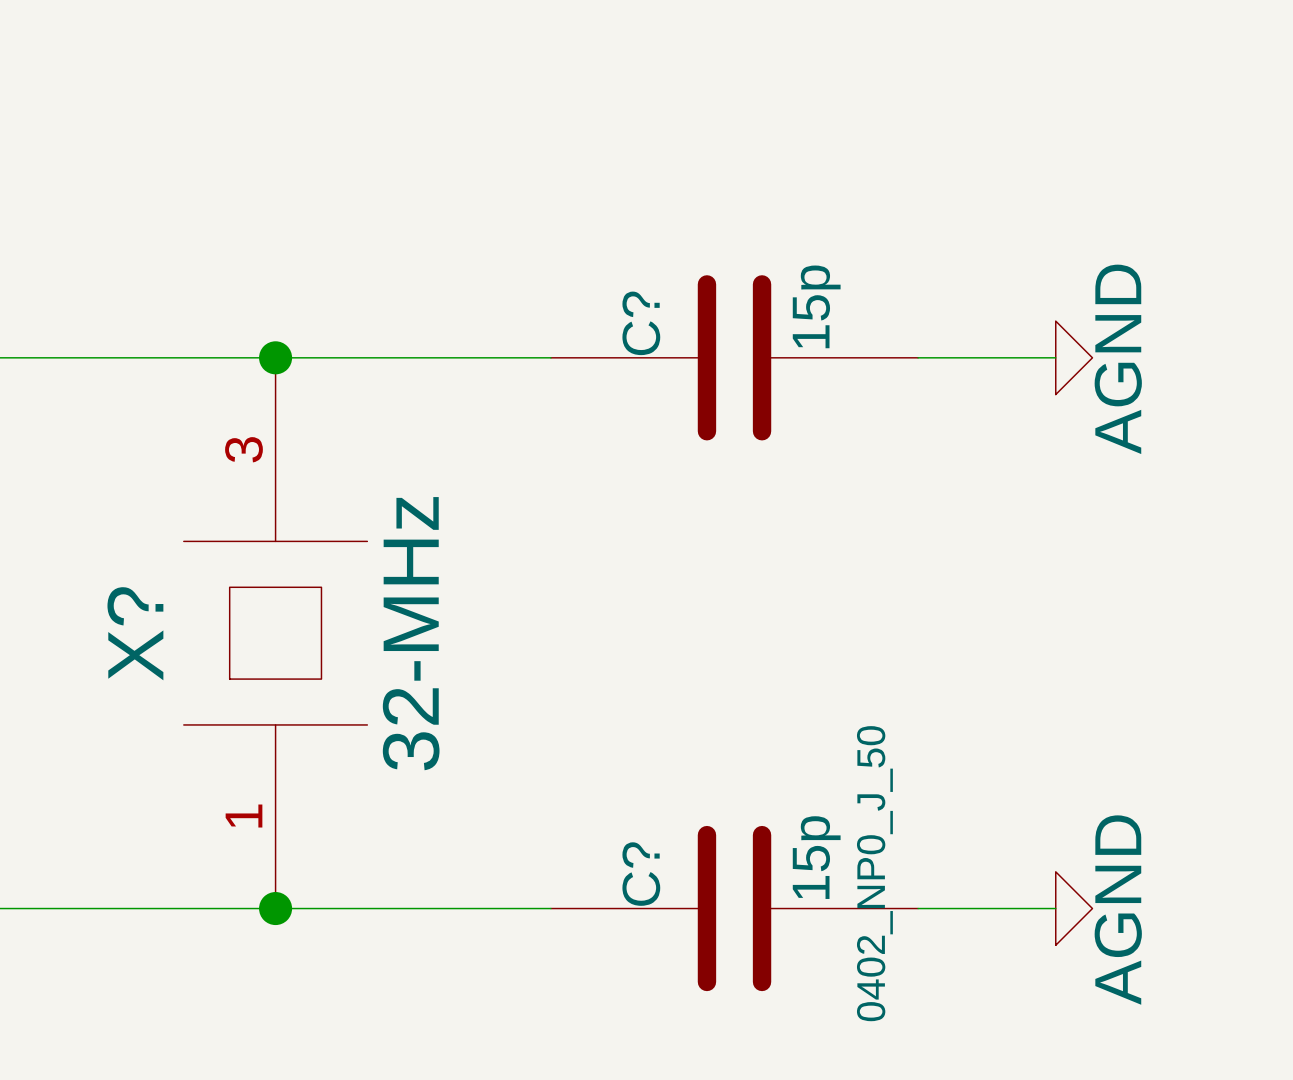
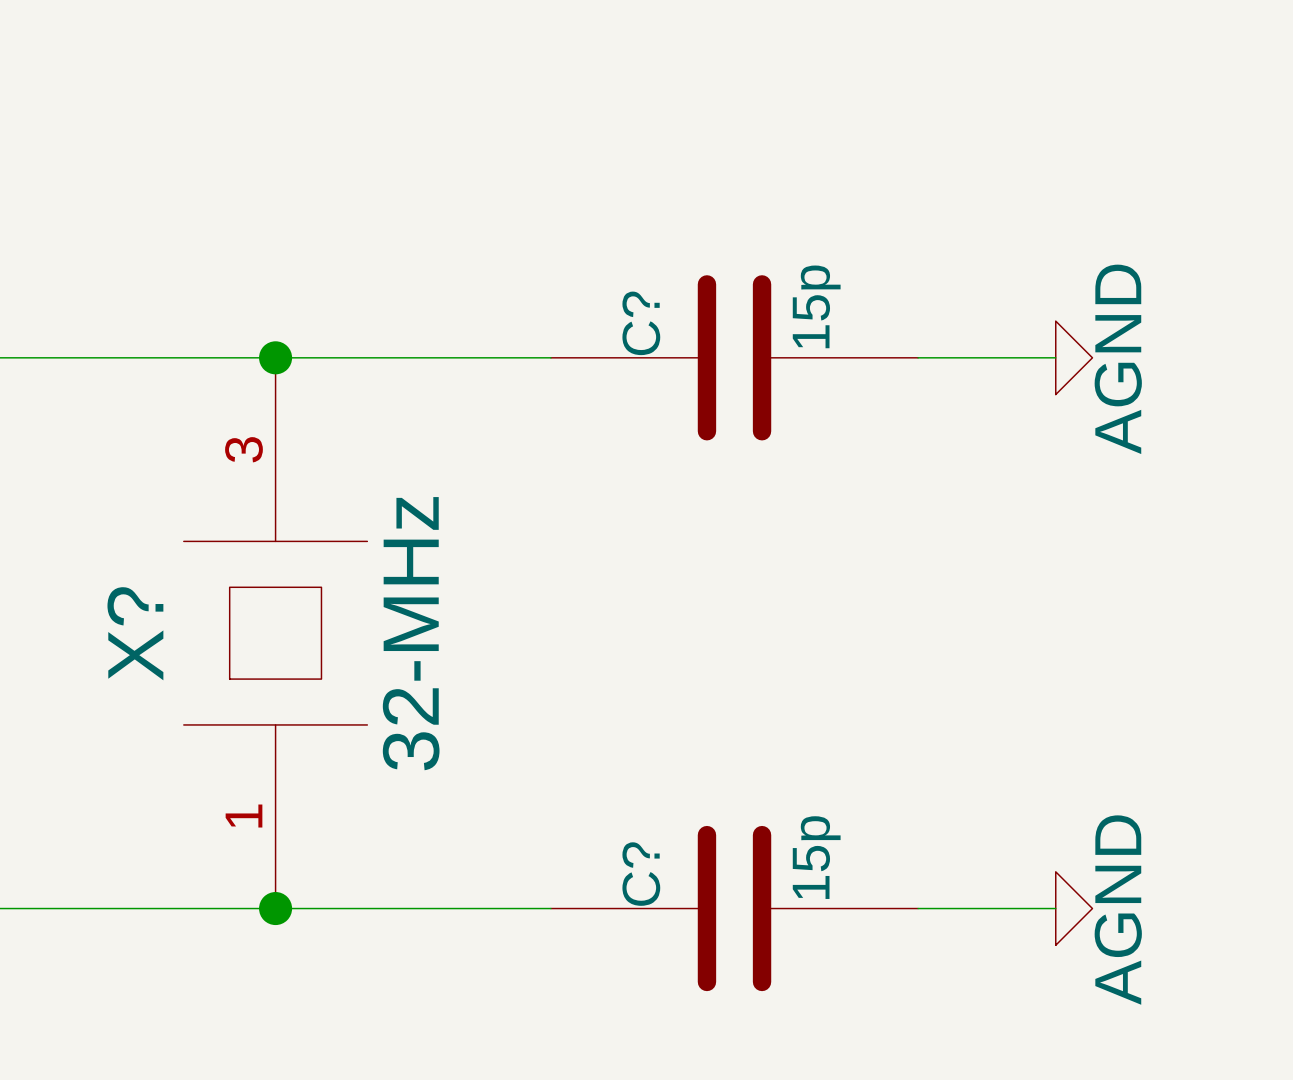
C? text: 0402_NP0_J_50 (874, 873) -> none

